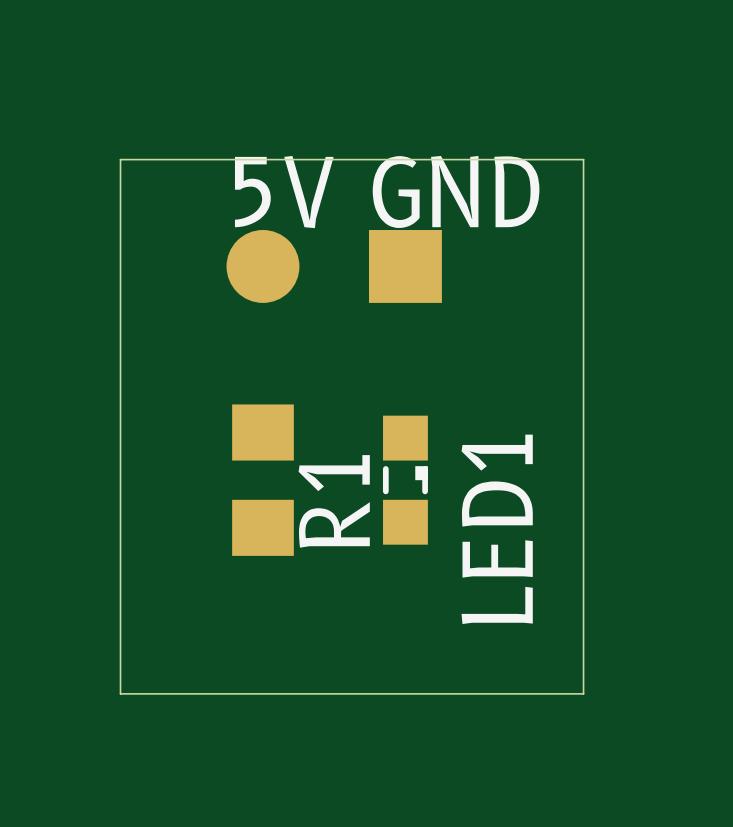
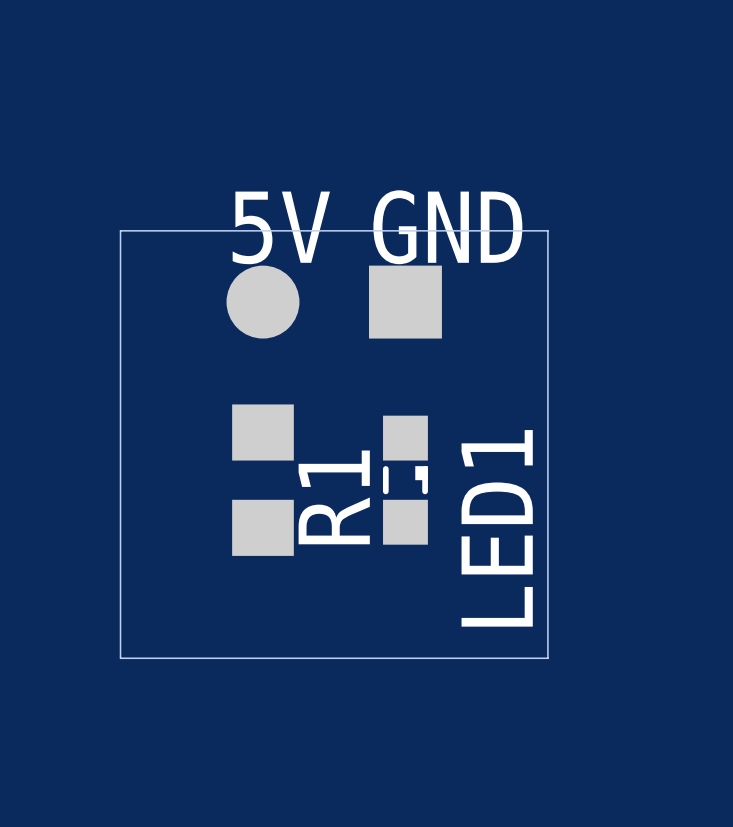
board edge: (120, 230) (120, 159) (583, 159) (583, 693) (120, 693) (120, 658) -> (120, 230) (547, 230) (547, 658) (120, 658)
5V position: (262, 266) -> (262, 302)
GND position: (405, 266) -> (405, 302)

